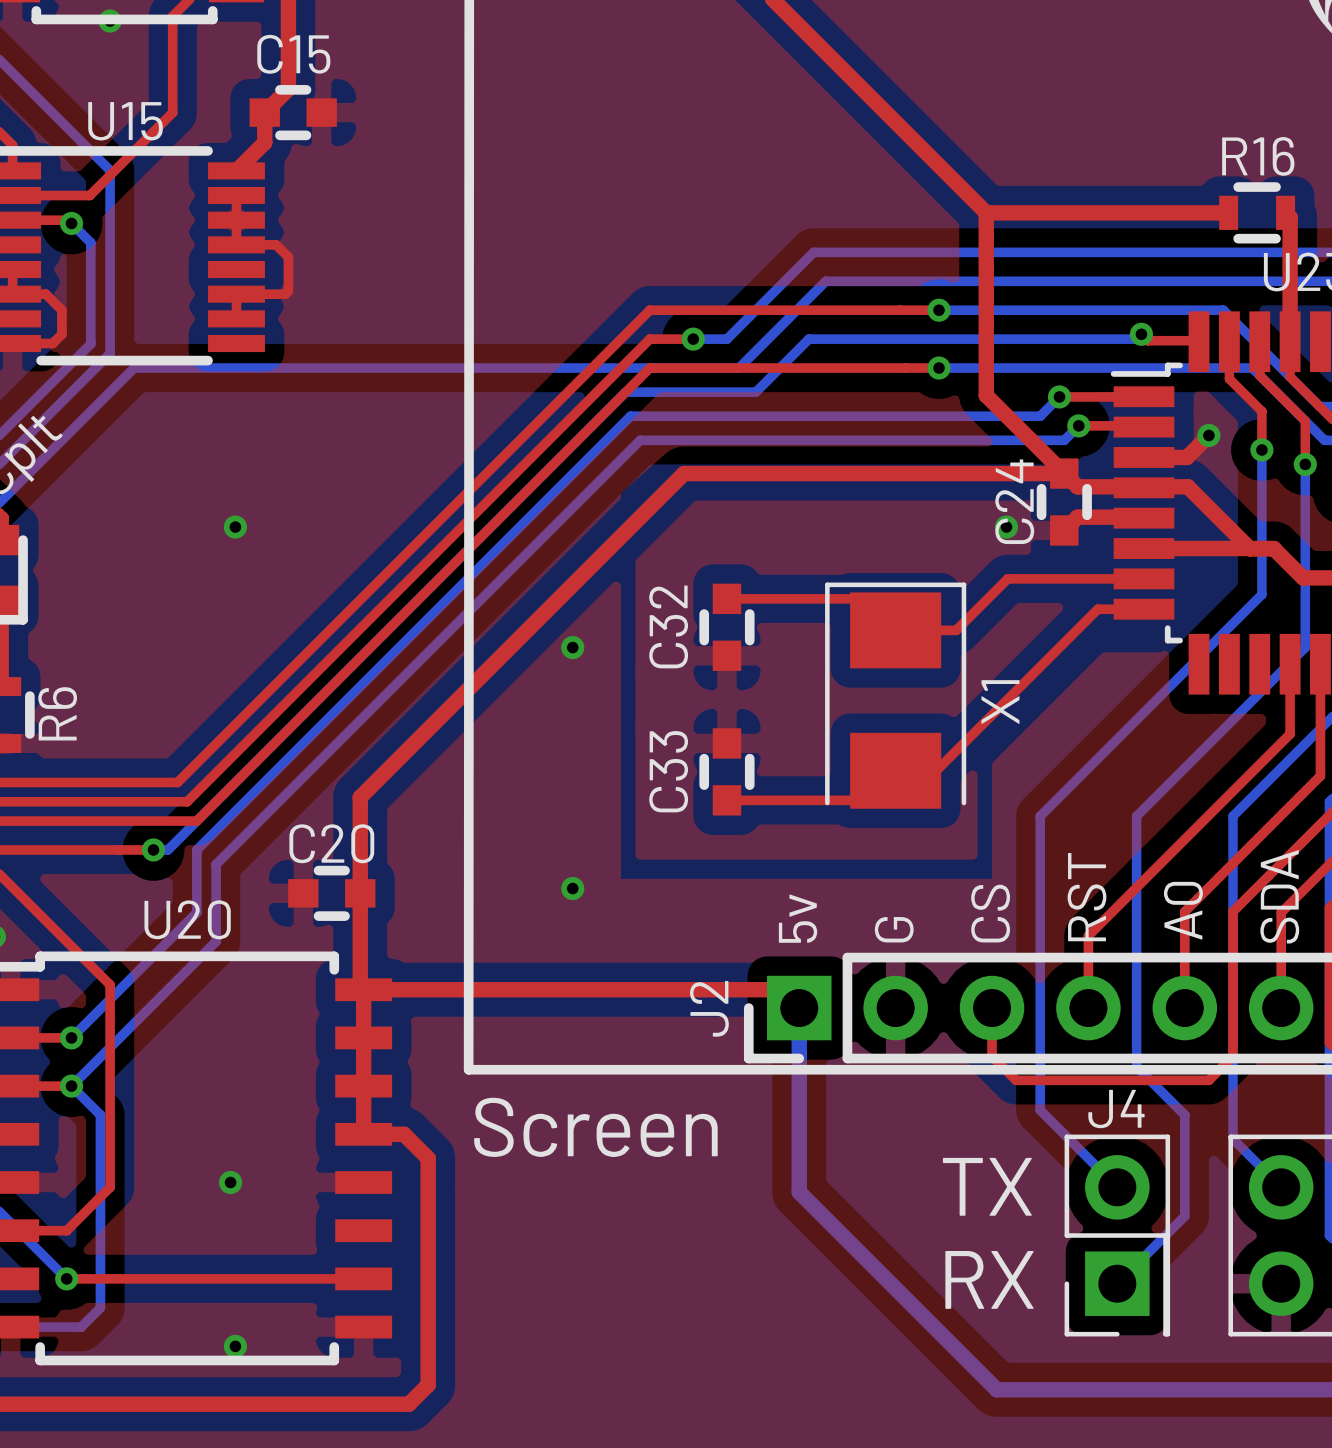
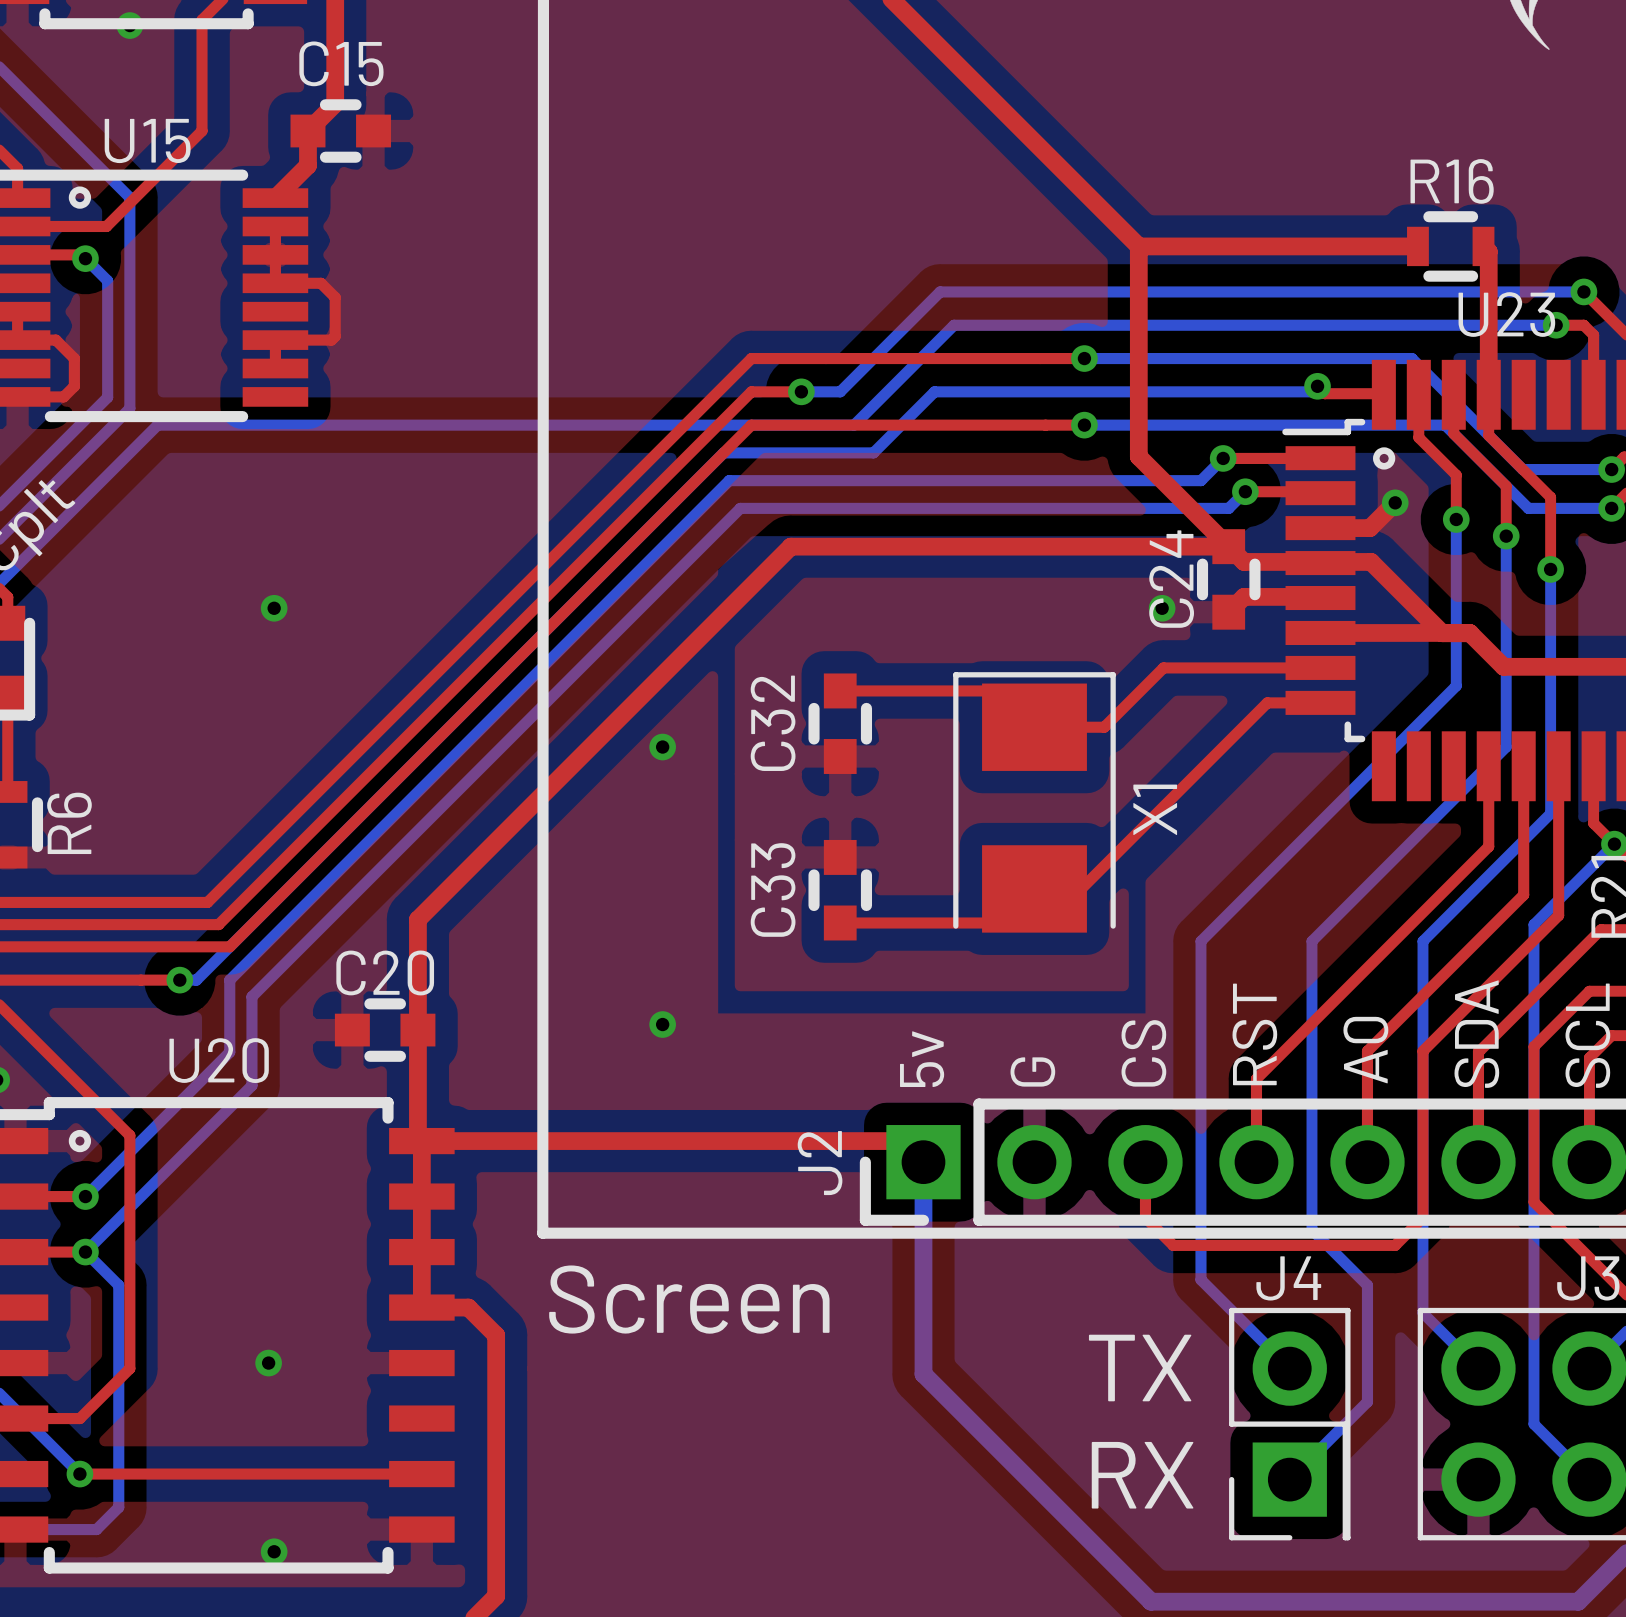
drawing: none -> [68, 186, 92, 209]
drawing: none -> [1373, 447, 1396, 470]
drawing: none -> [68, 1129, 92, 1153]

